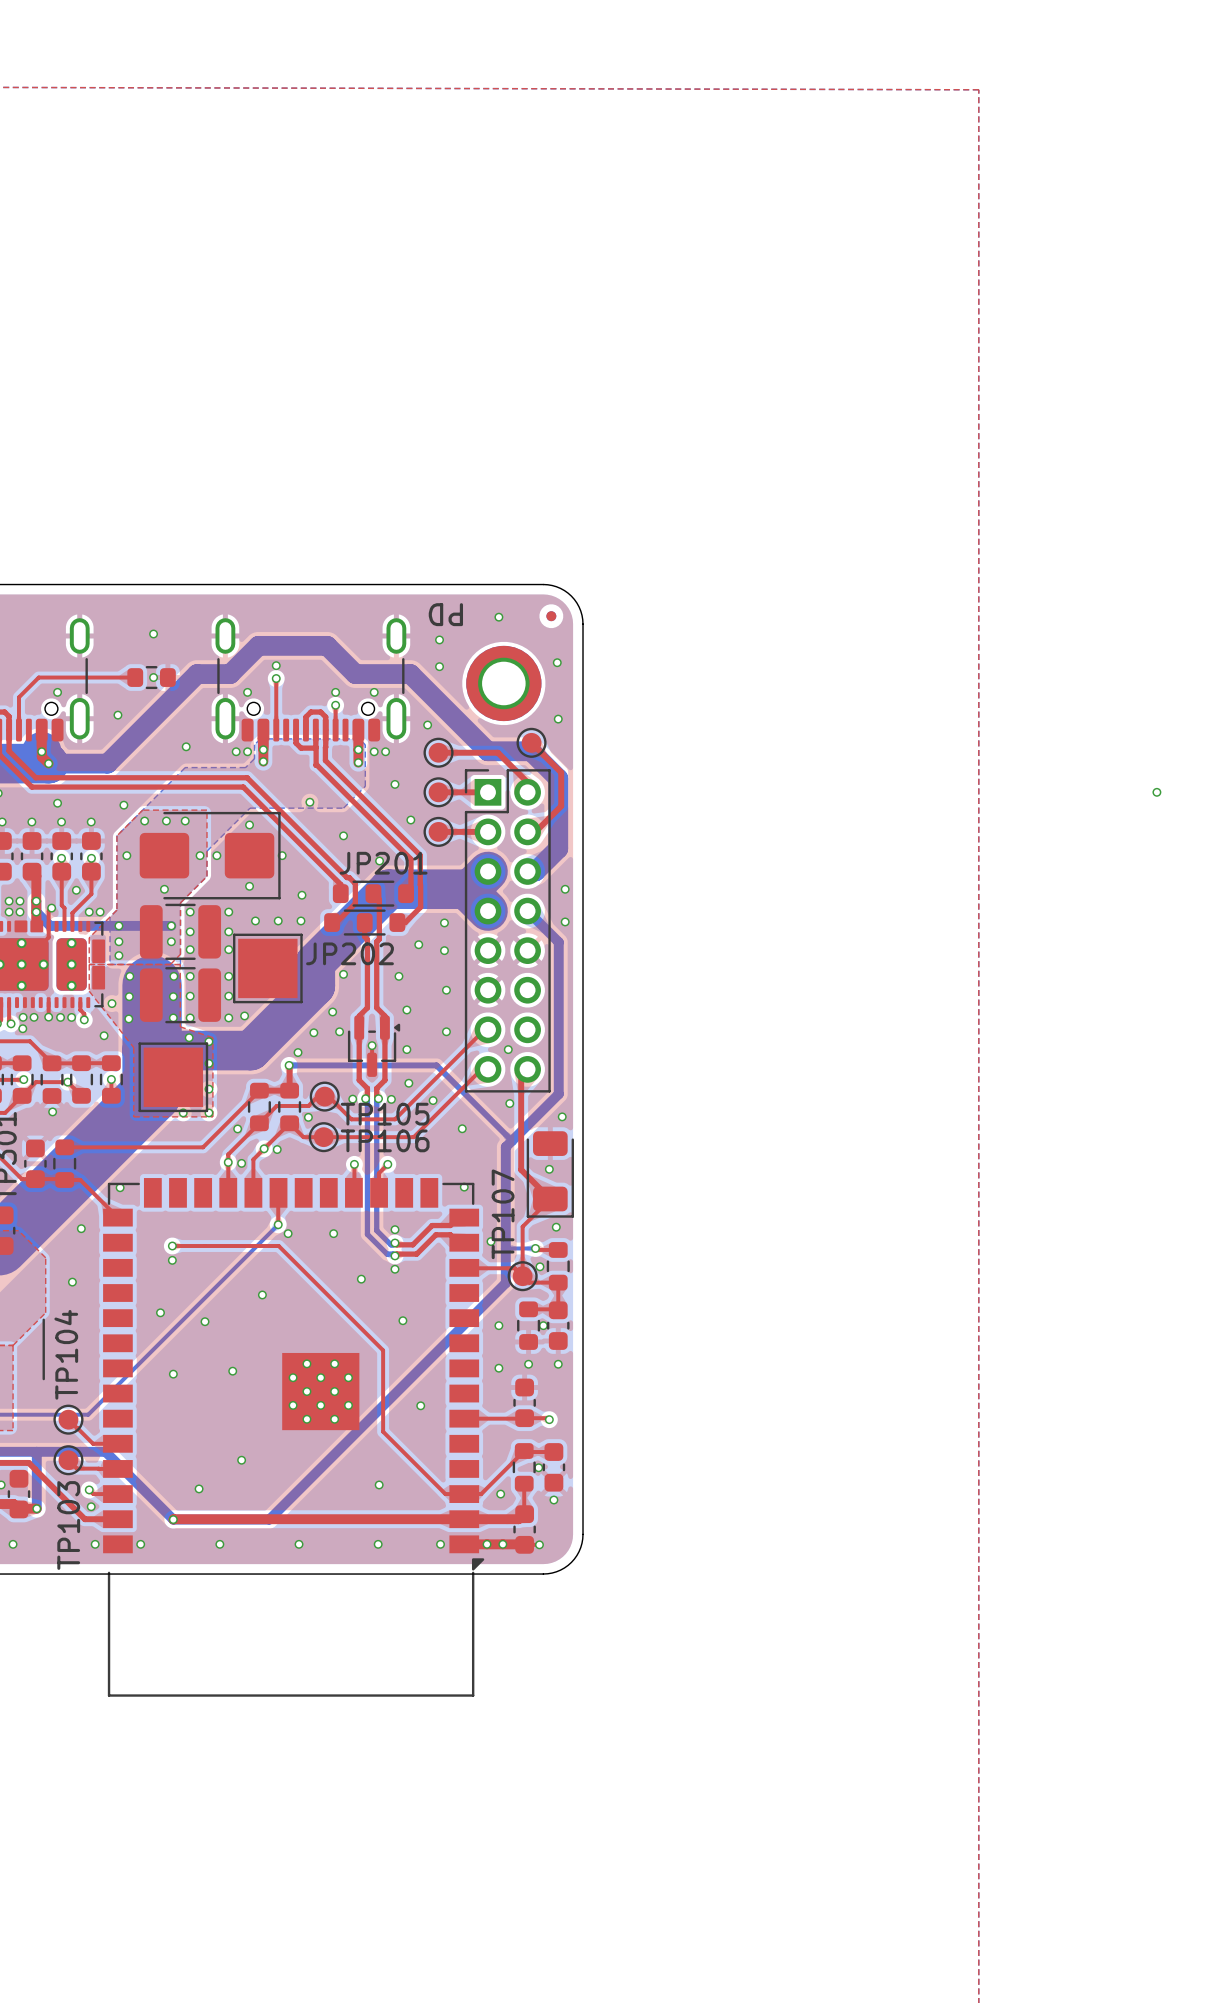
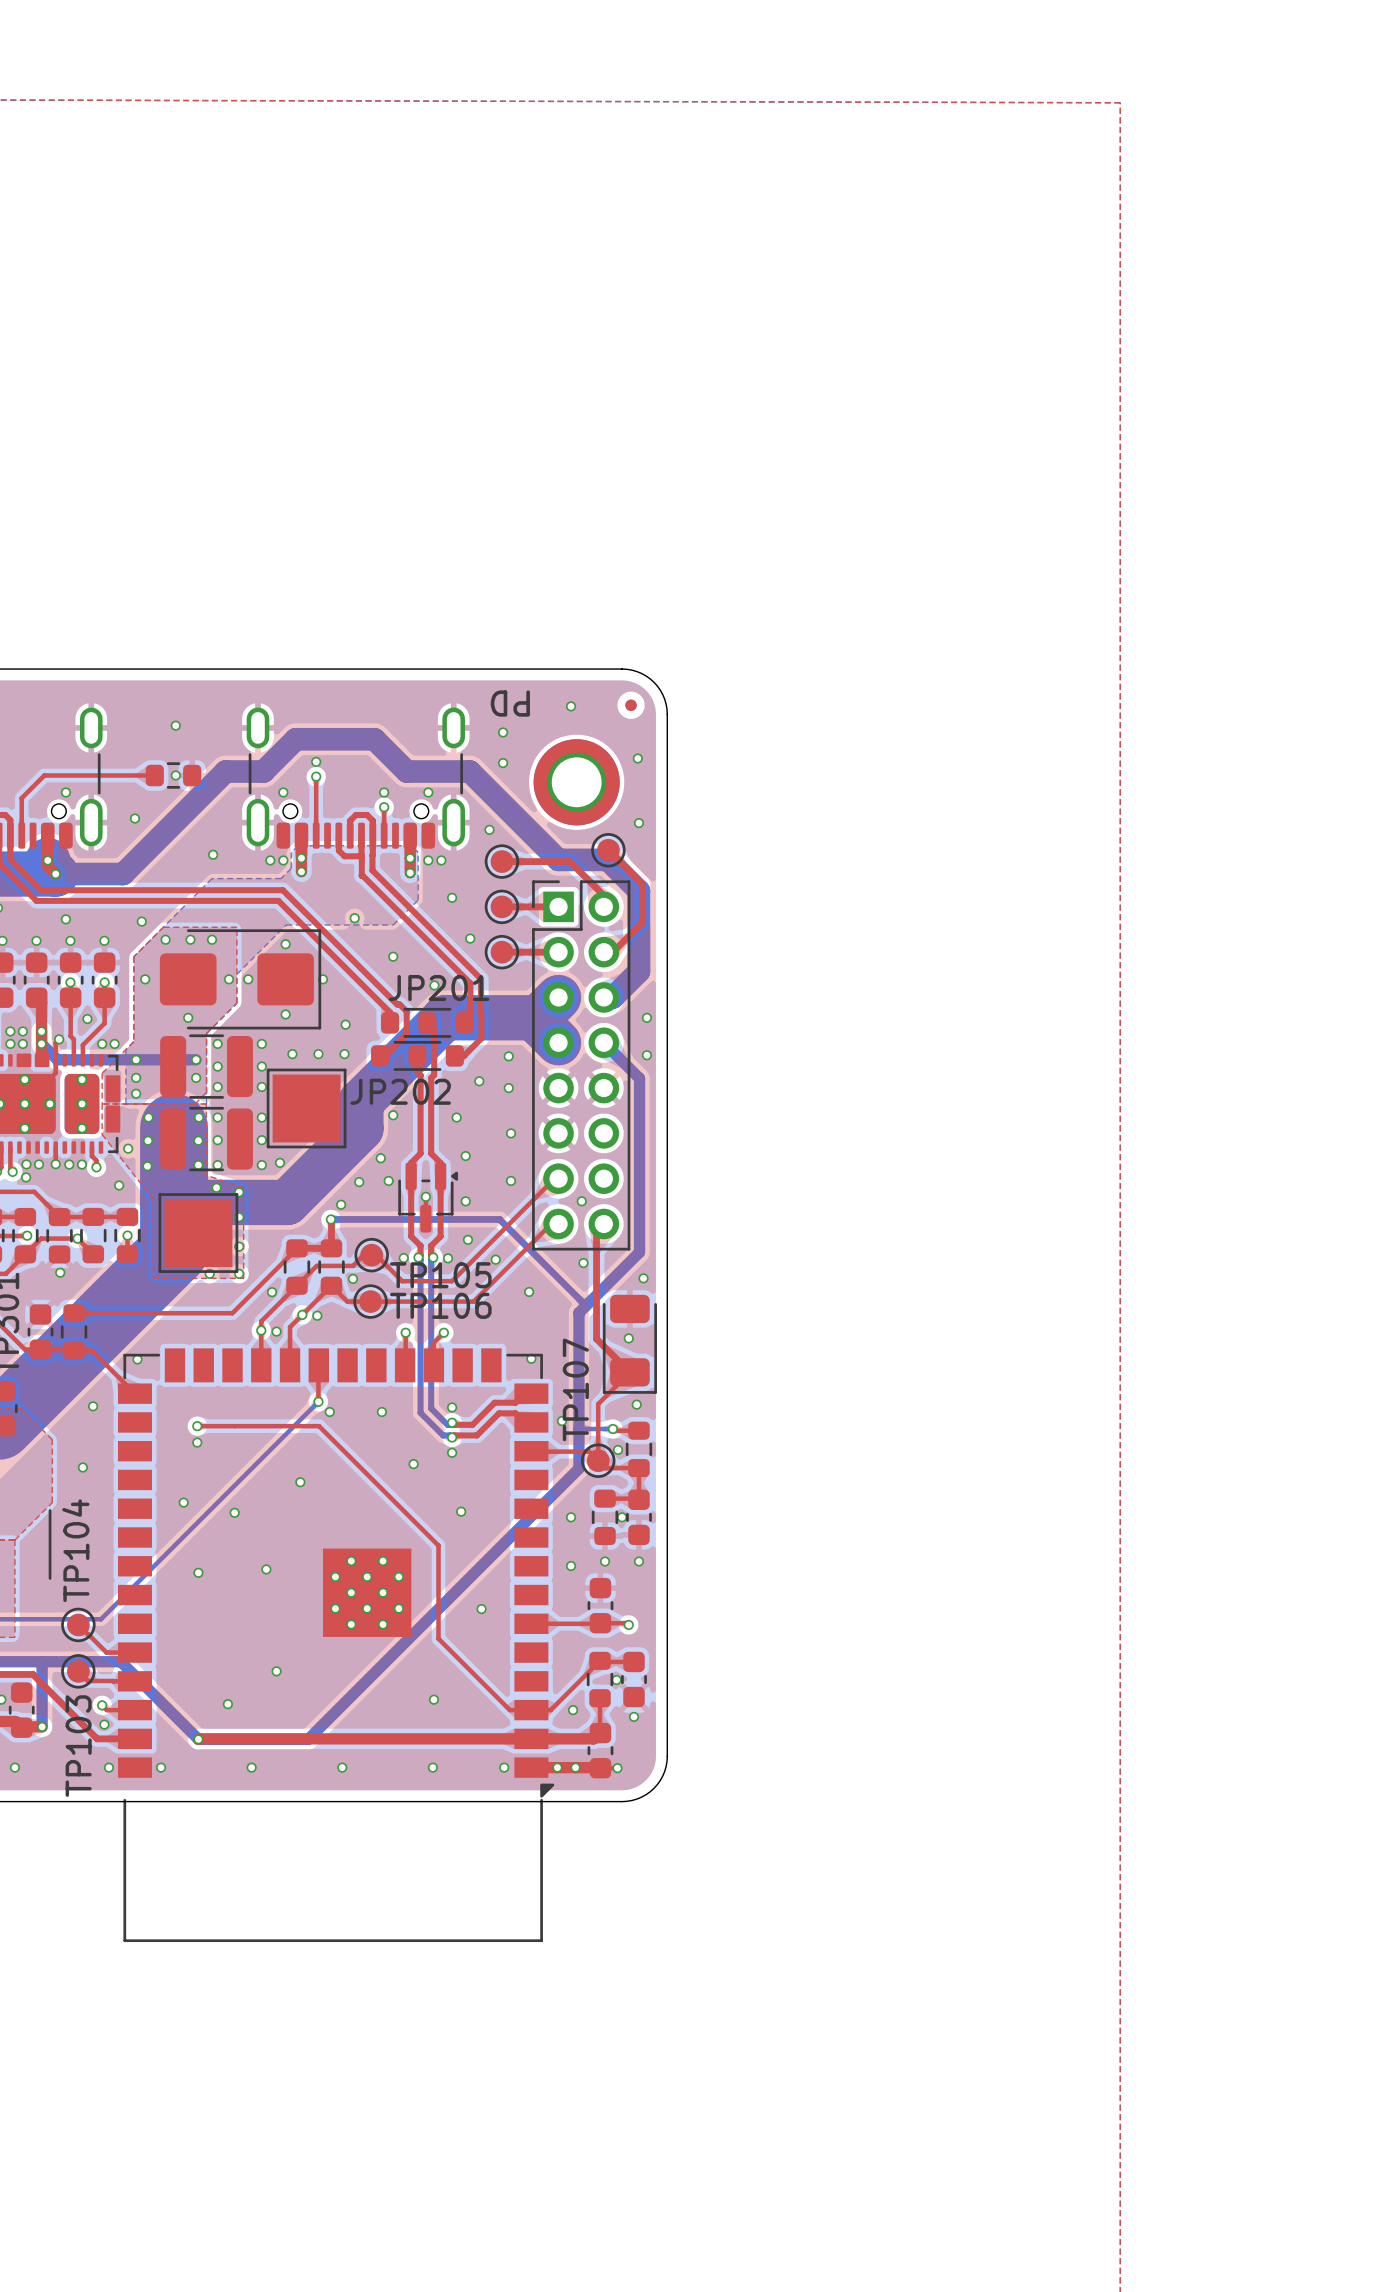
via: (1156, 792) -> none

